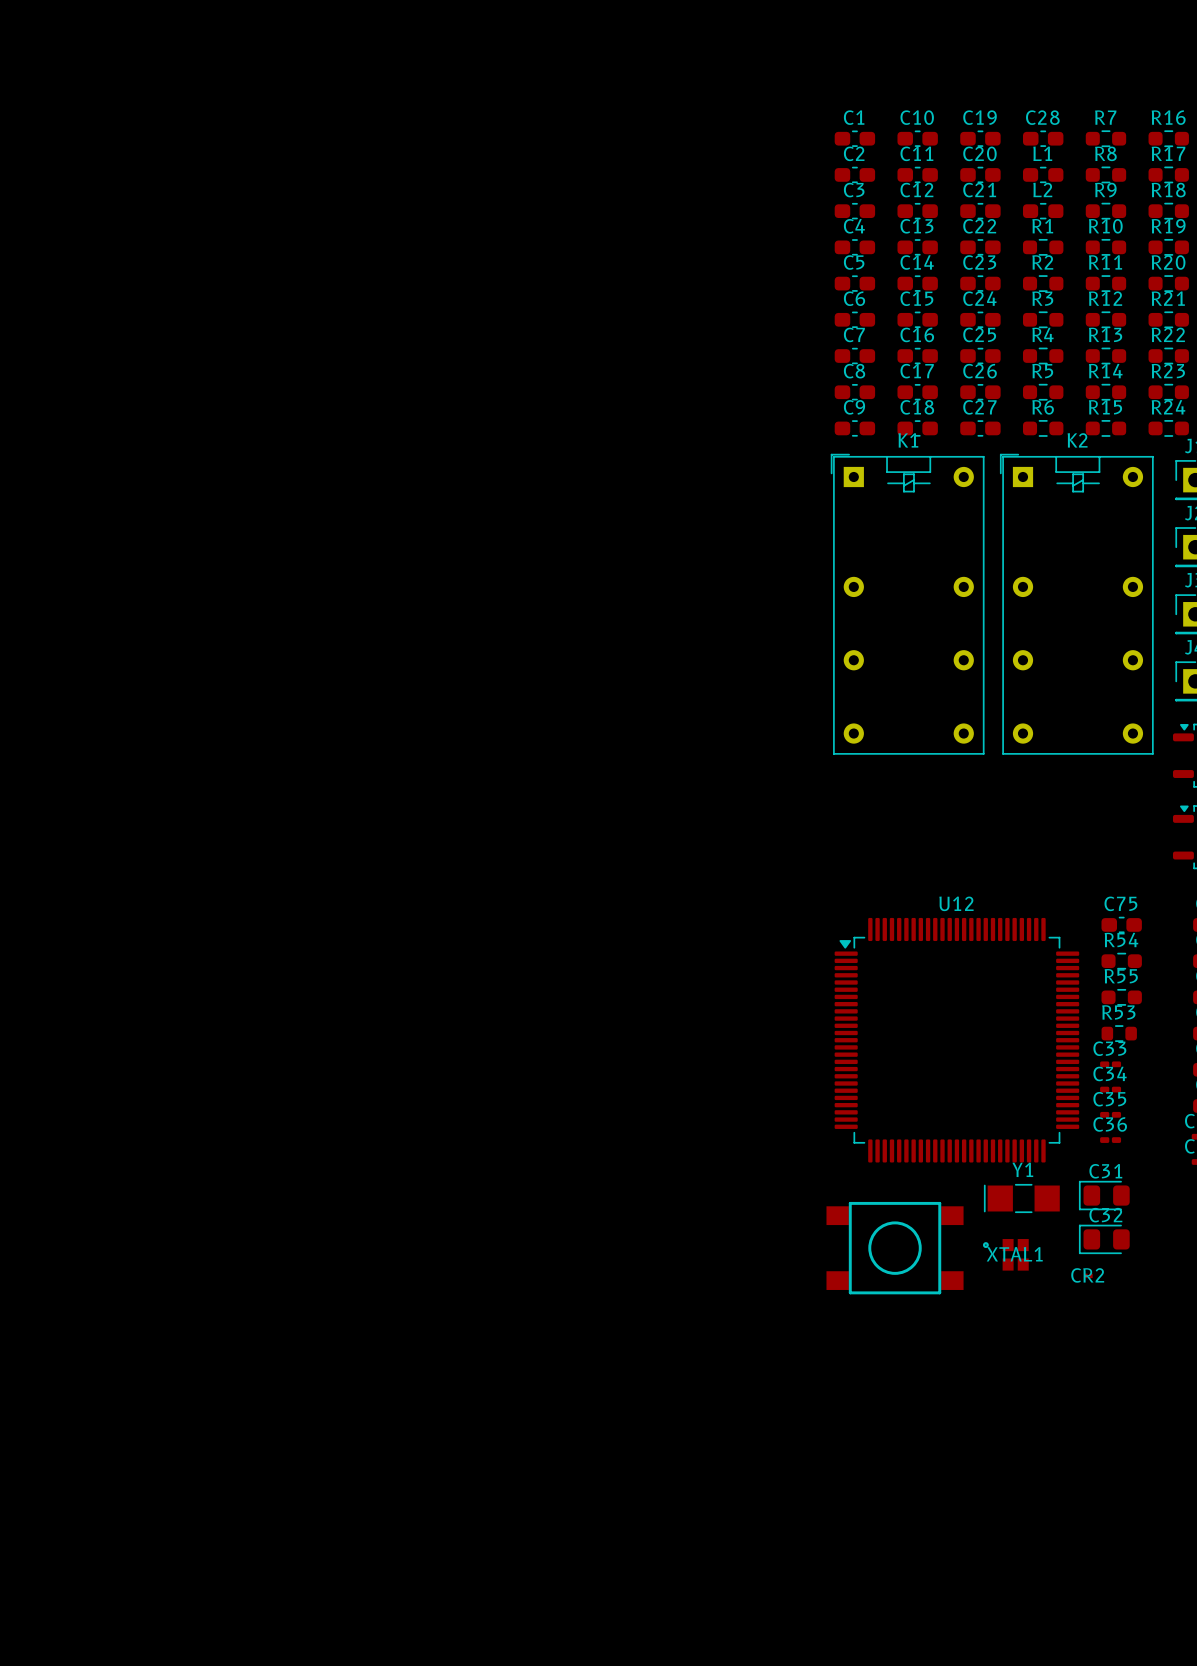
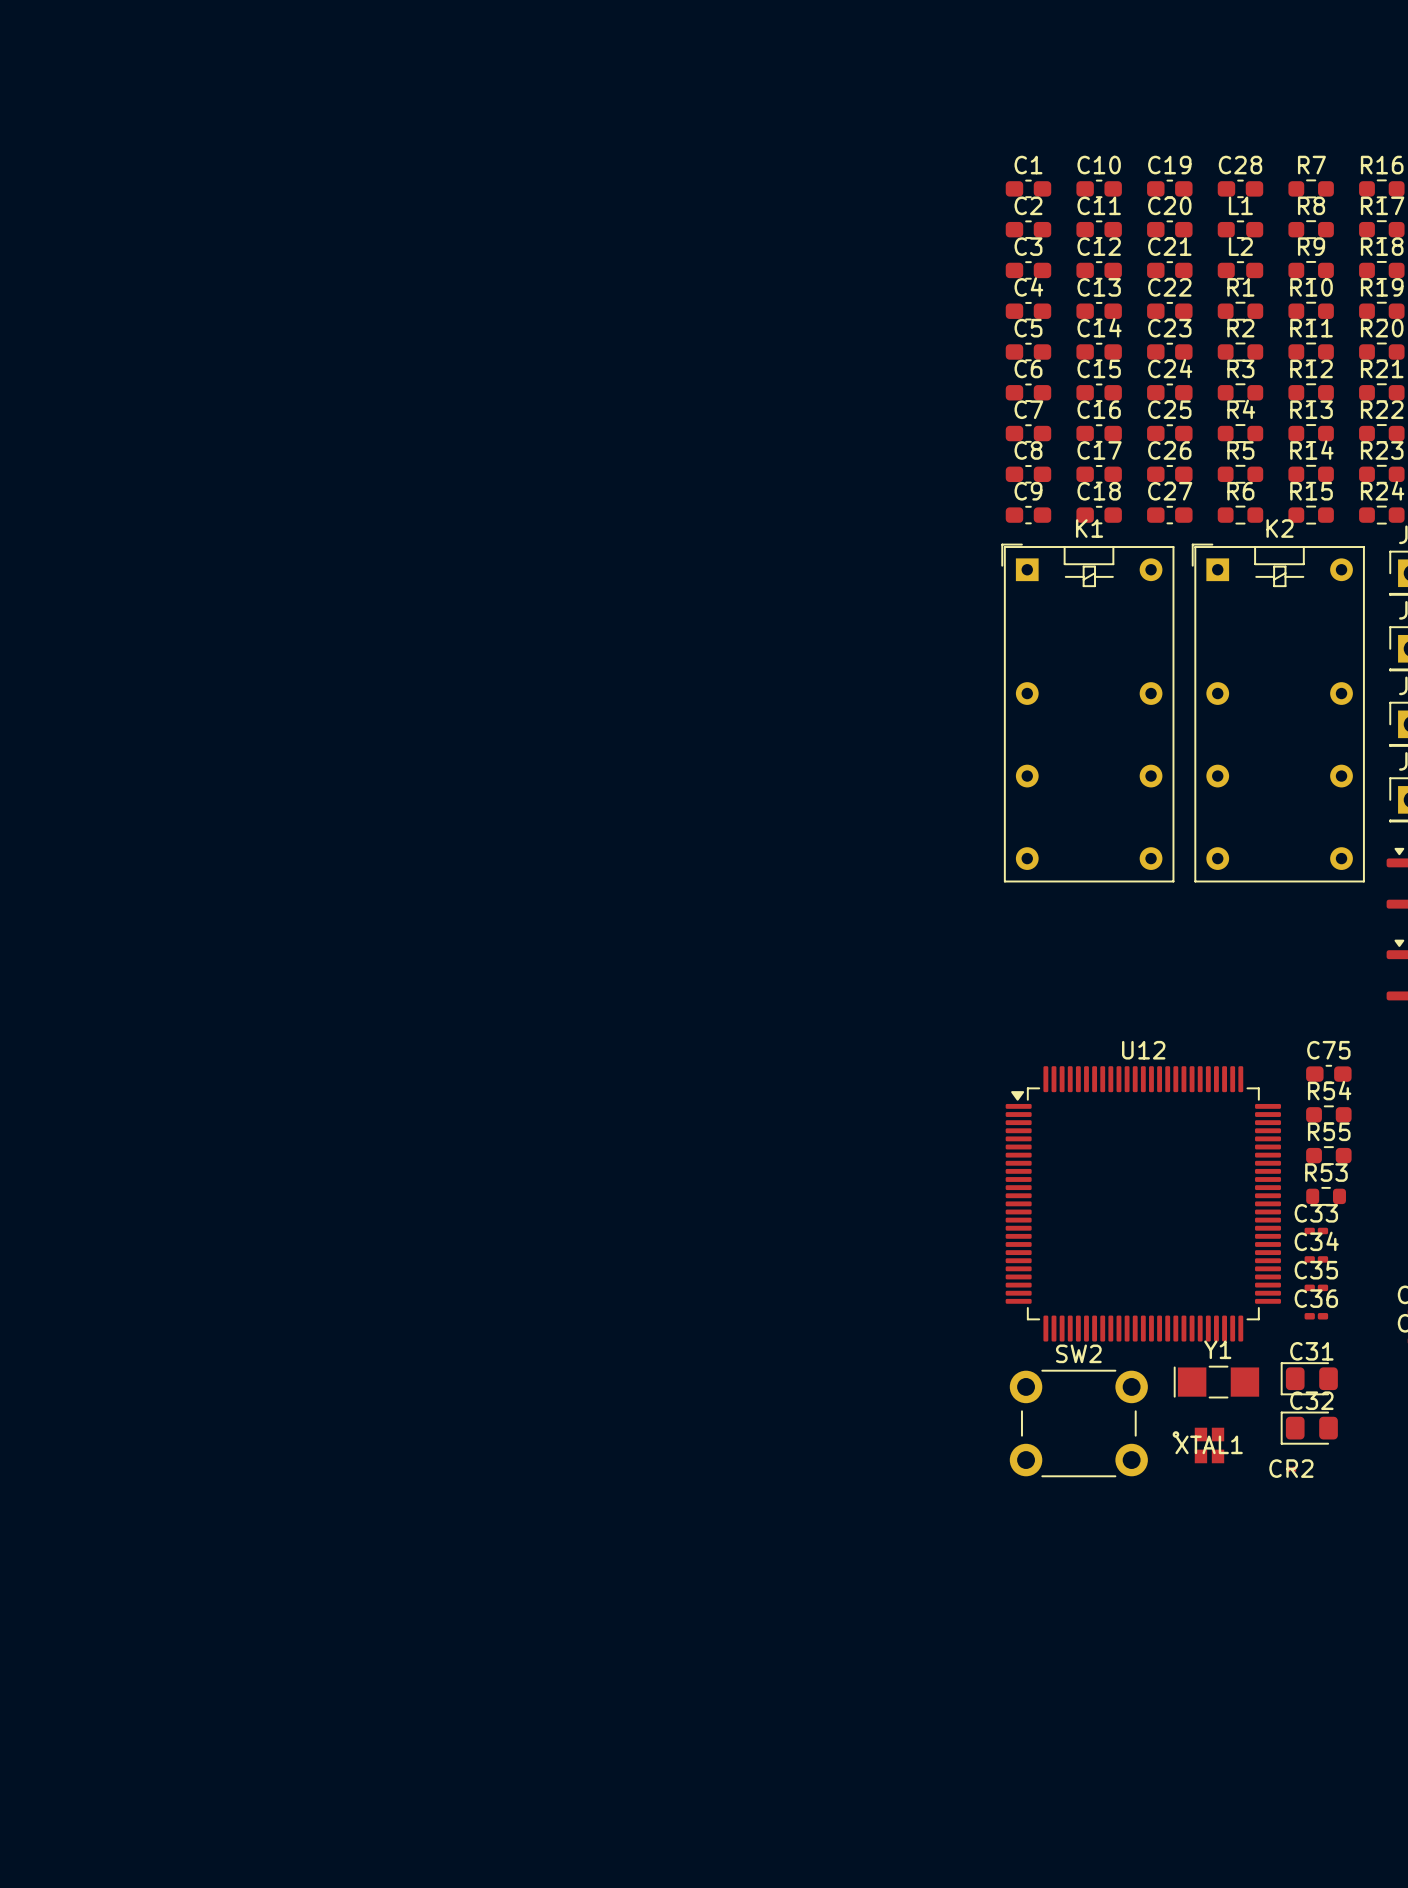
SW2: none -> (1078, 1423)
part: (895, 1248) -> none

